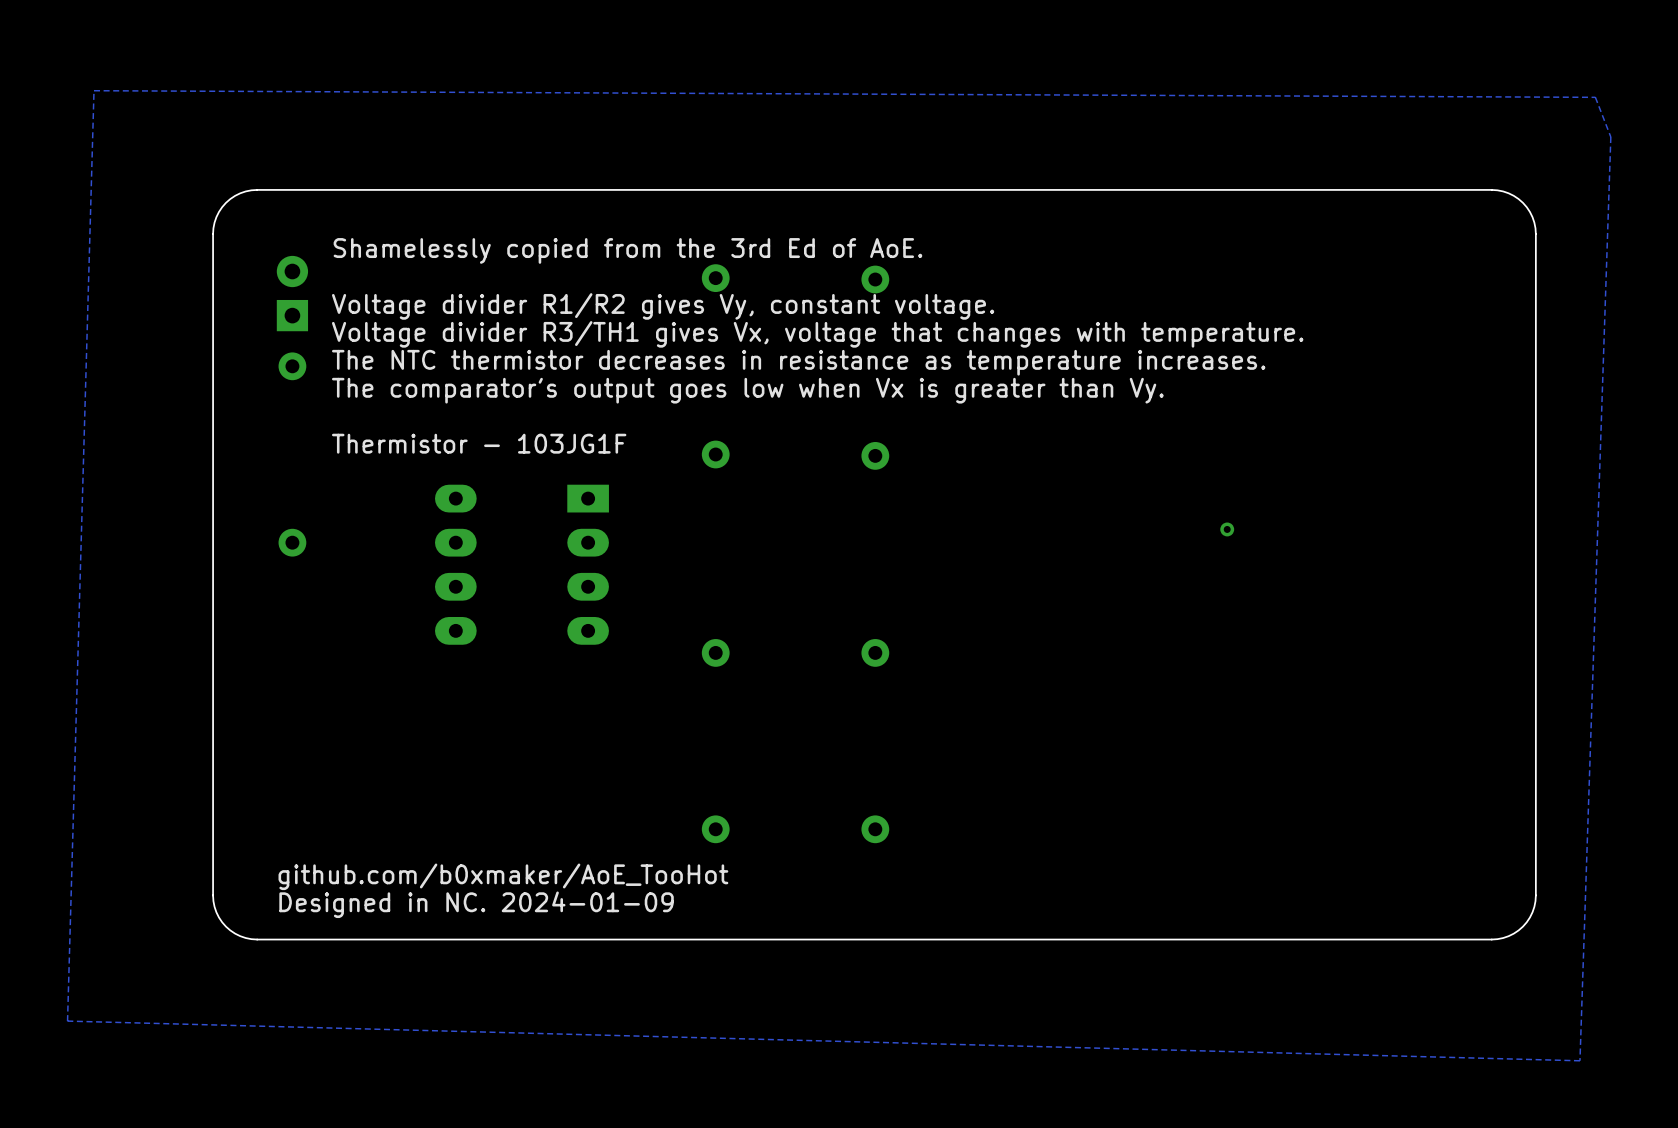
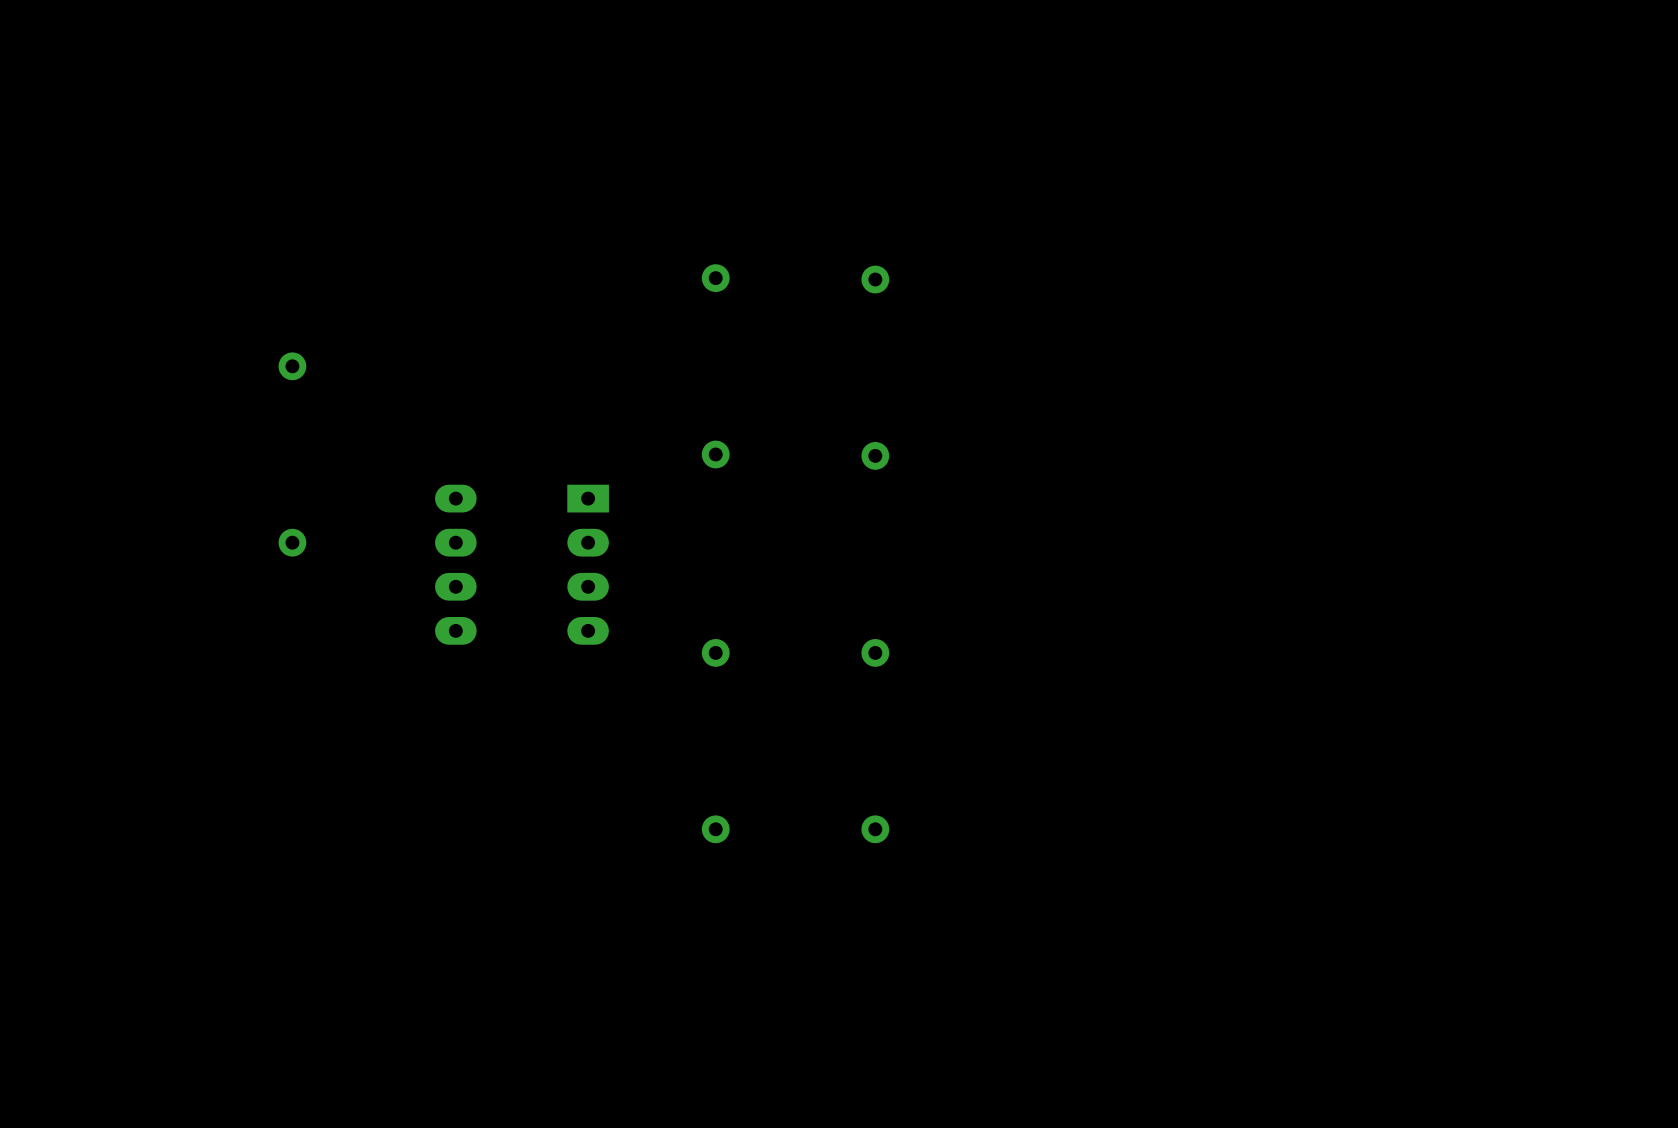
zone outline: (94, 90) (67, 1021) (1579, 1060) (1610, 137) (1595, 97) (94, 90) -> none
board edge: (1491, 189) (257, 189) (245, 191) (235, 195) (225, 202) (218, 211) (214, 222) (213, 234) (213, 895) (214, 906) (218, 917) (225, 926) (235, 933) (245, 938) (257, 939) (1491, 939) (1503, 938) (1513, 933) (1522, 926) (1529, 917) (1534, 906) (1535, 895) (1535, 234) (1532, 217) (1522, 202) (1508, 193) (1491, 189) -> none
text: Shamelessly copied from the 3rd Ed of AoE. (627, 250) -> none
part: (292, 293) -> none
text: Voltage divider R1/R2 gives Vy, constant voltage. (663, 306) -> none
text: Voltage divider R3/TH1 gives Vx, voltage that changes with temperature. (817, 334) -> none
text: The NTC thermistor decreases in resistance as temperature increases. (798, 362) -> none
text: The comparator's output goes low when Vx is greater than Vy. (747, 390) -> none
text: Thermistor - 103JG1F (479, 443) -> none
via: (1227, 529) -> none
text: github.com/b0xmaker/AoE_TooHot (503, 876) -> none
text: Designed in NC. 2024-01-09 (476, 904) -> none

